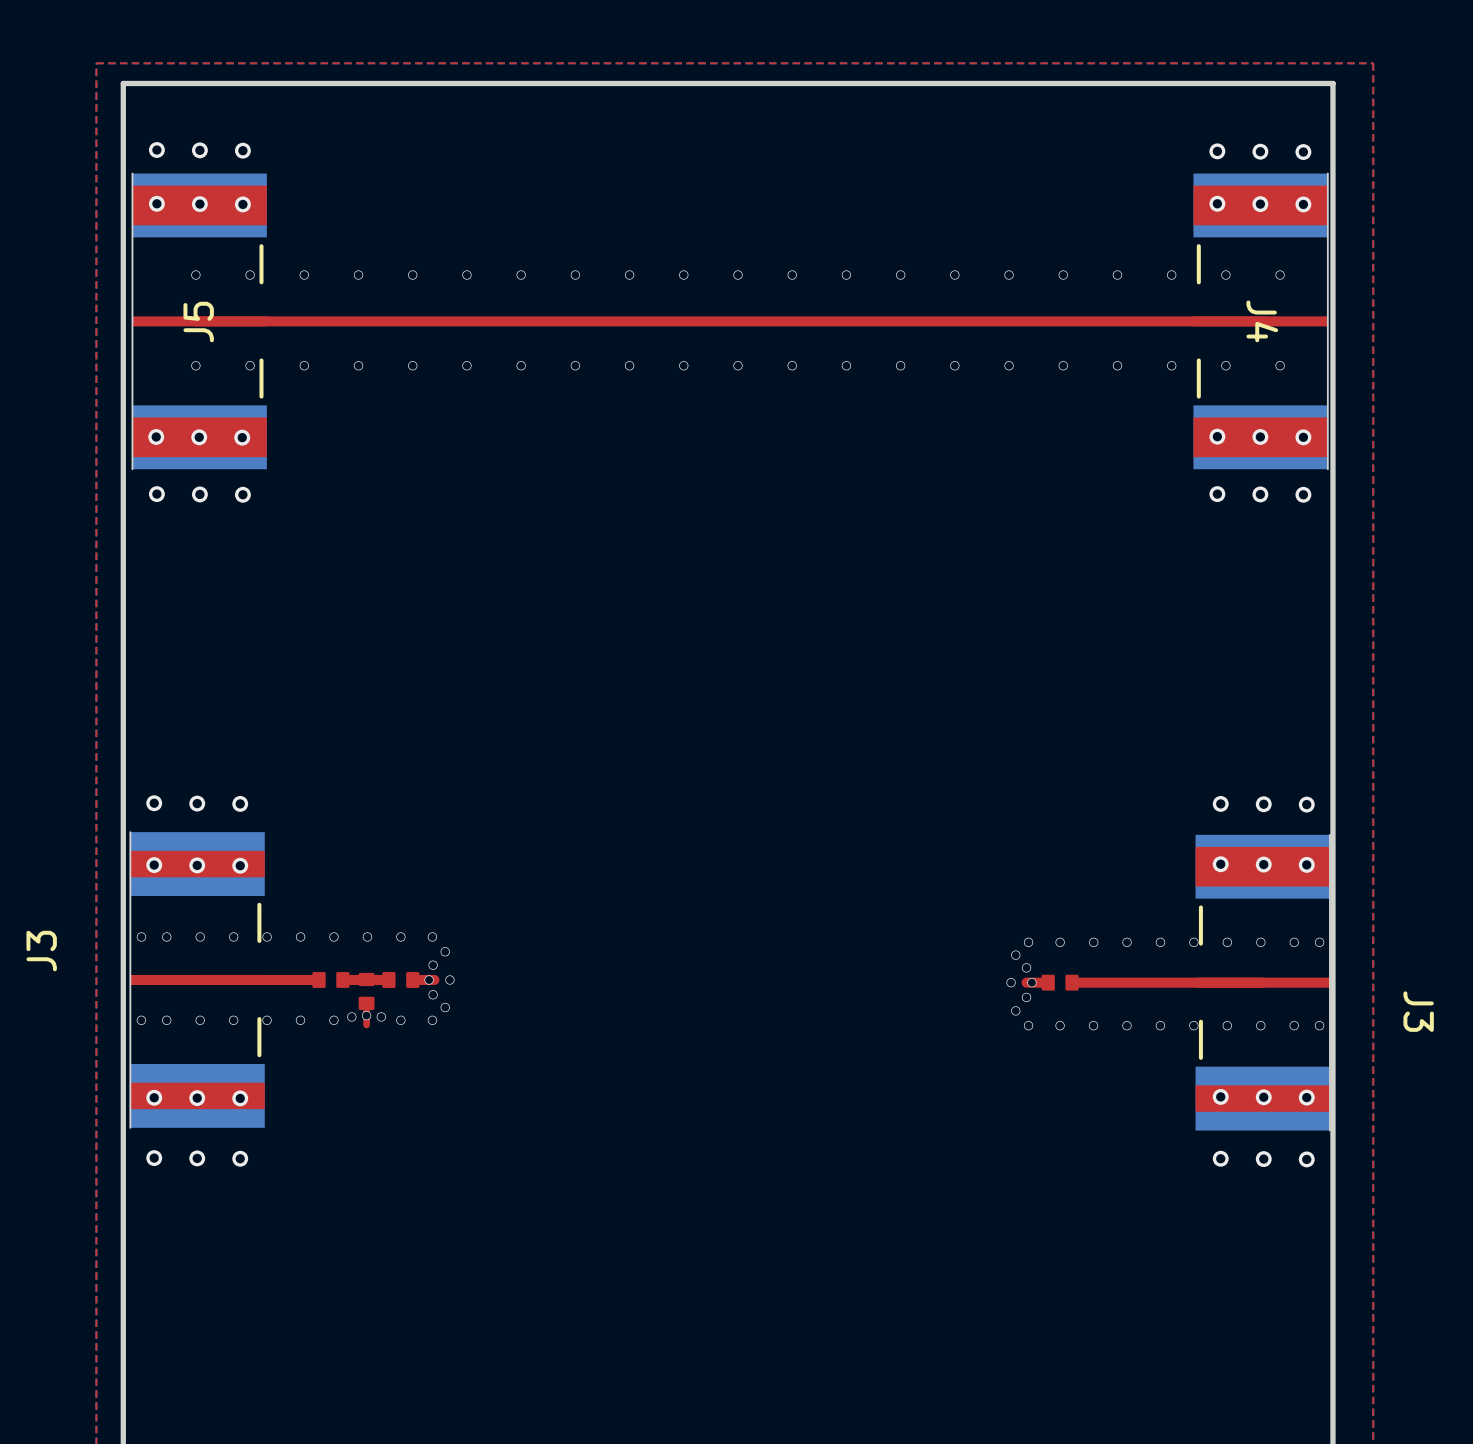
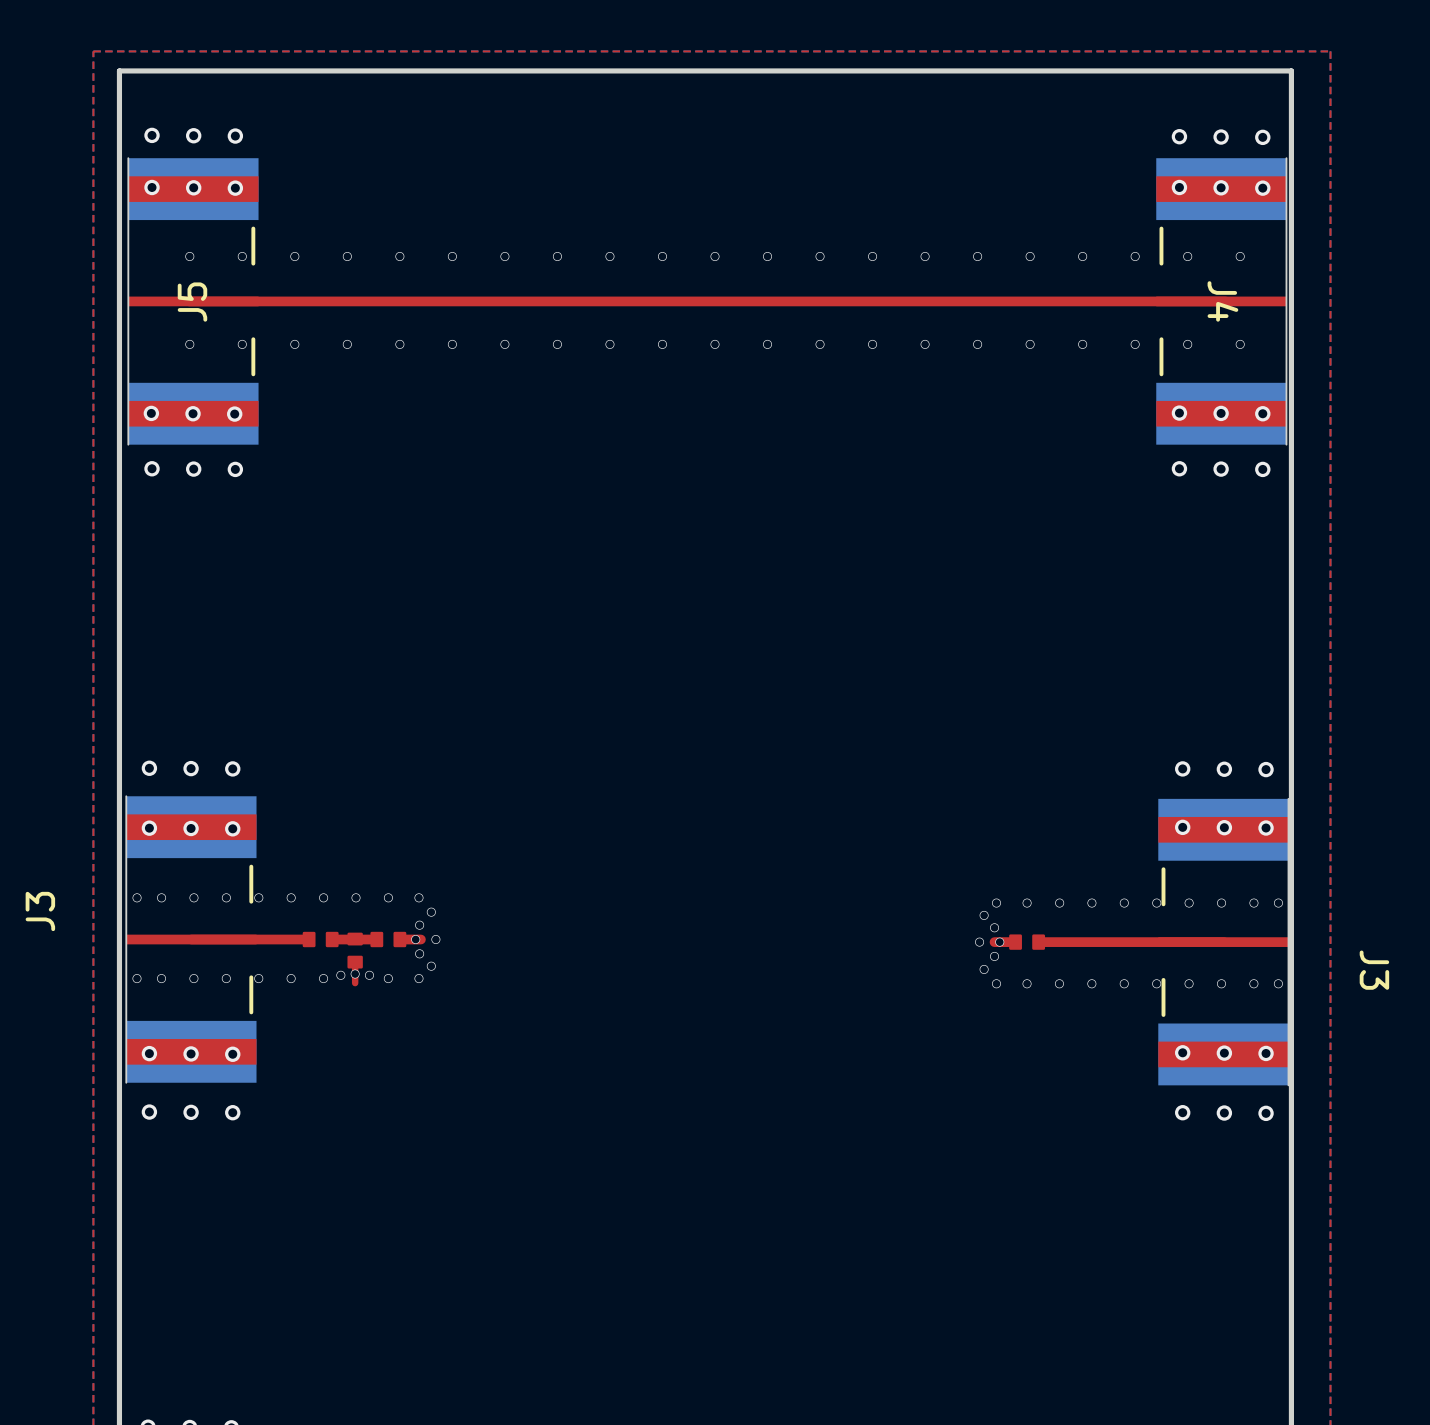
J5 footprint: [132, 173, 267, 470] -> [128, 157, 259, 446]
J4 footprint: [1193, 173, 1329, 470] -> [1156, 157, 1287, 446]
J3 footprint: [1195, 834, 1331, 1131] -> [1158, 798, 1289, 1086]

